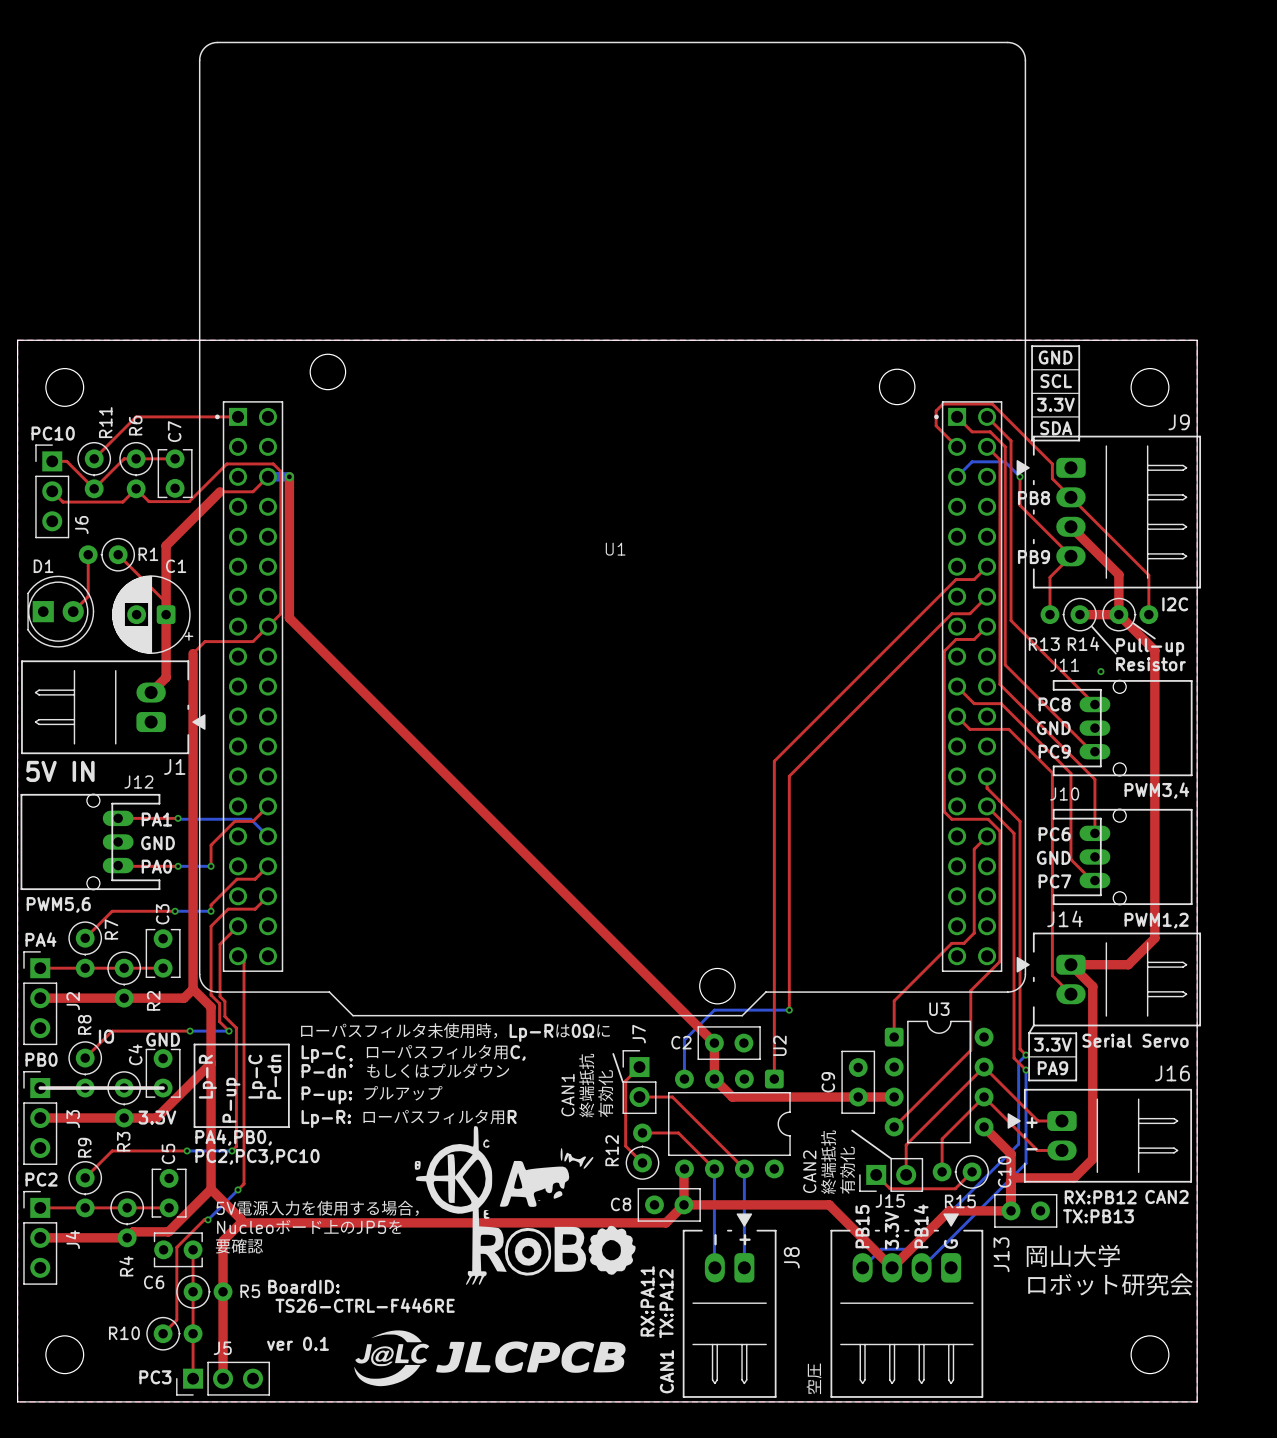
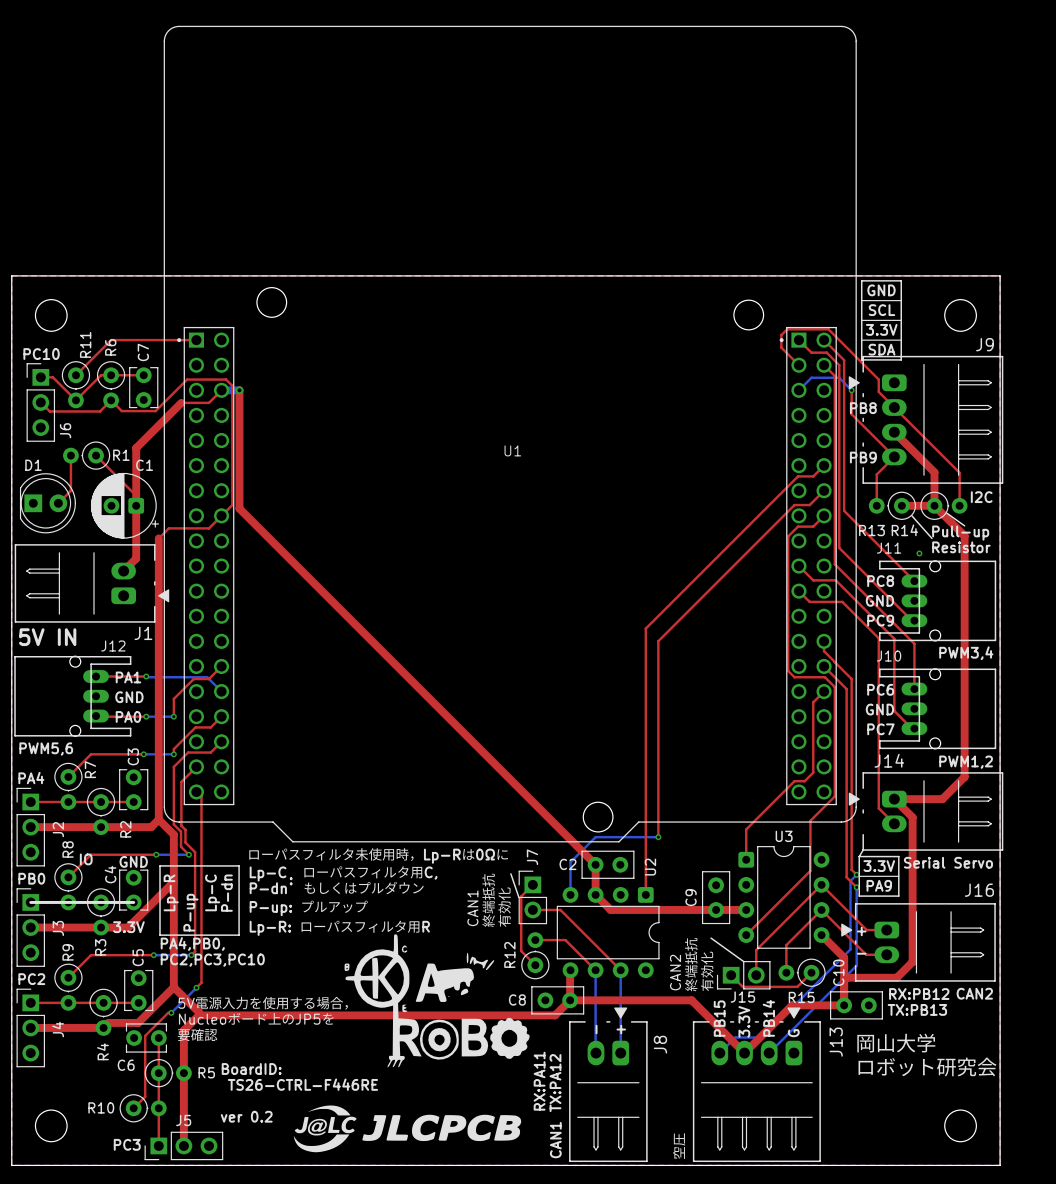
text: ver 0.1 (297, 1343) -> ver 0.2 (246, 1116)

